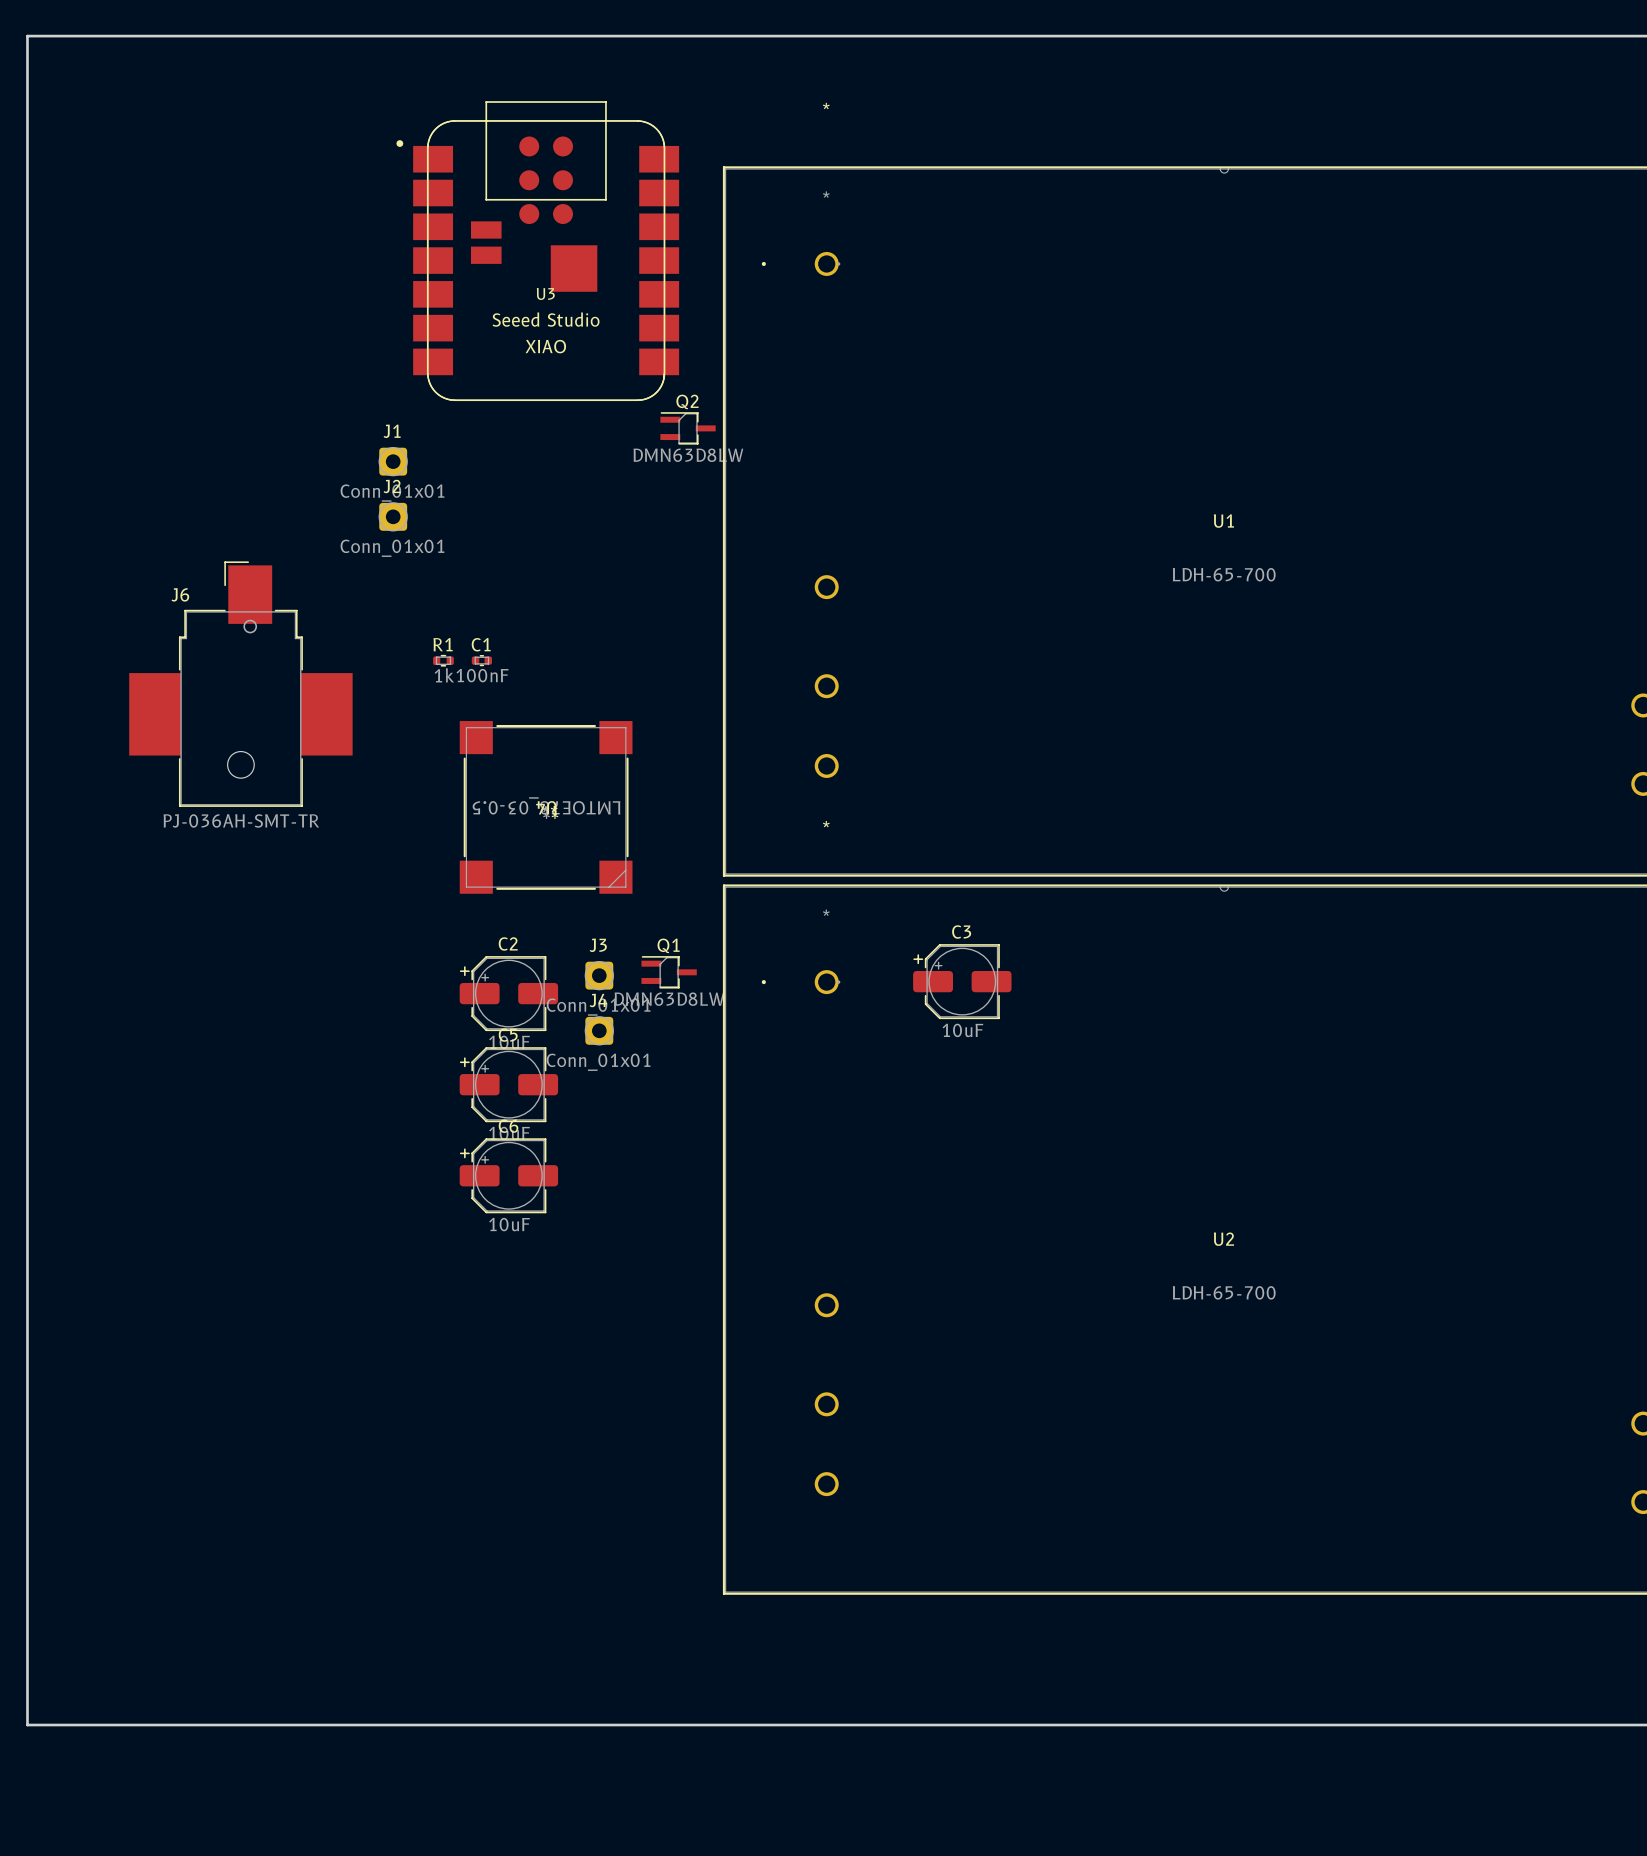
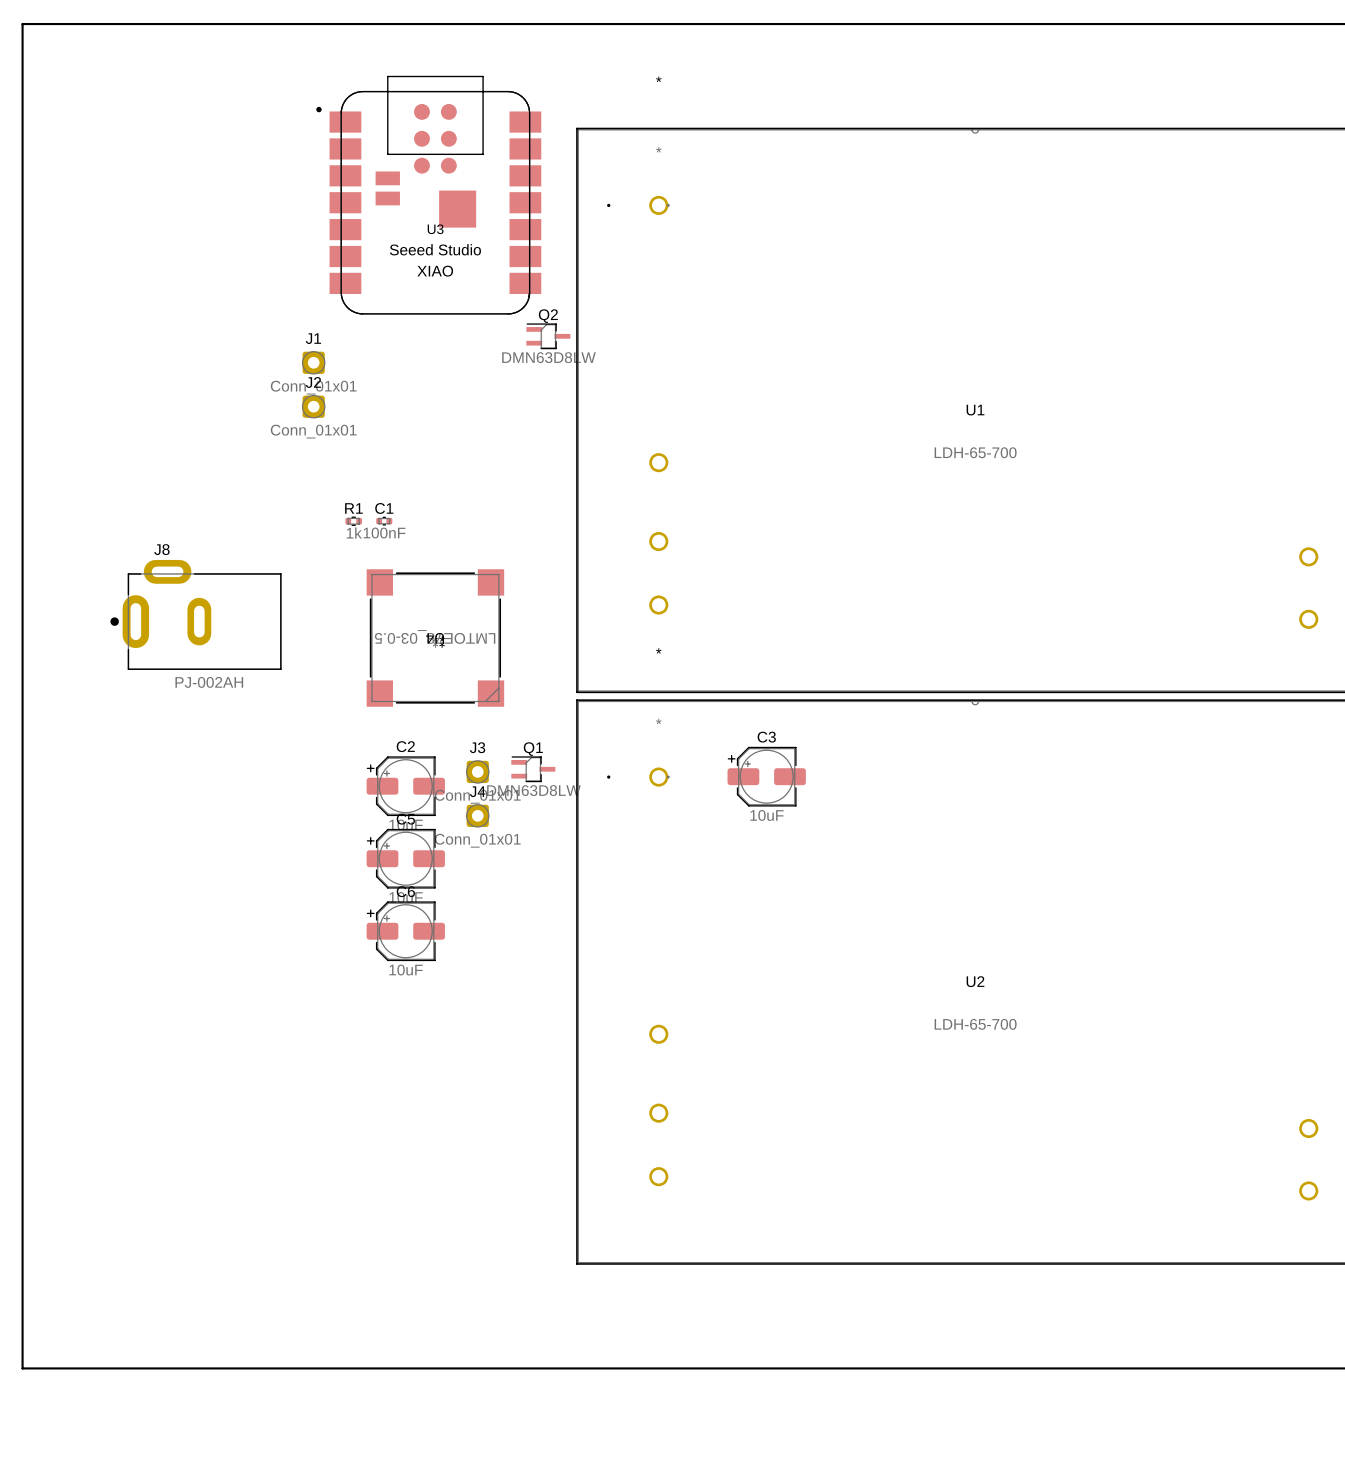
J6: PJ-036AH-SMT-TR (240, 684) -> none
J8: none -> PJ-002AH (195, 614)

